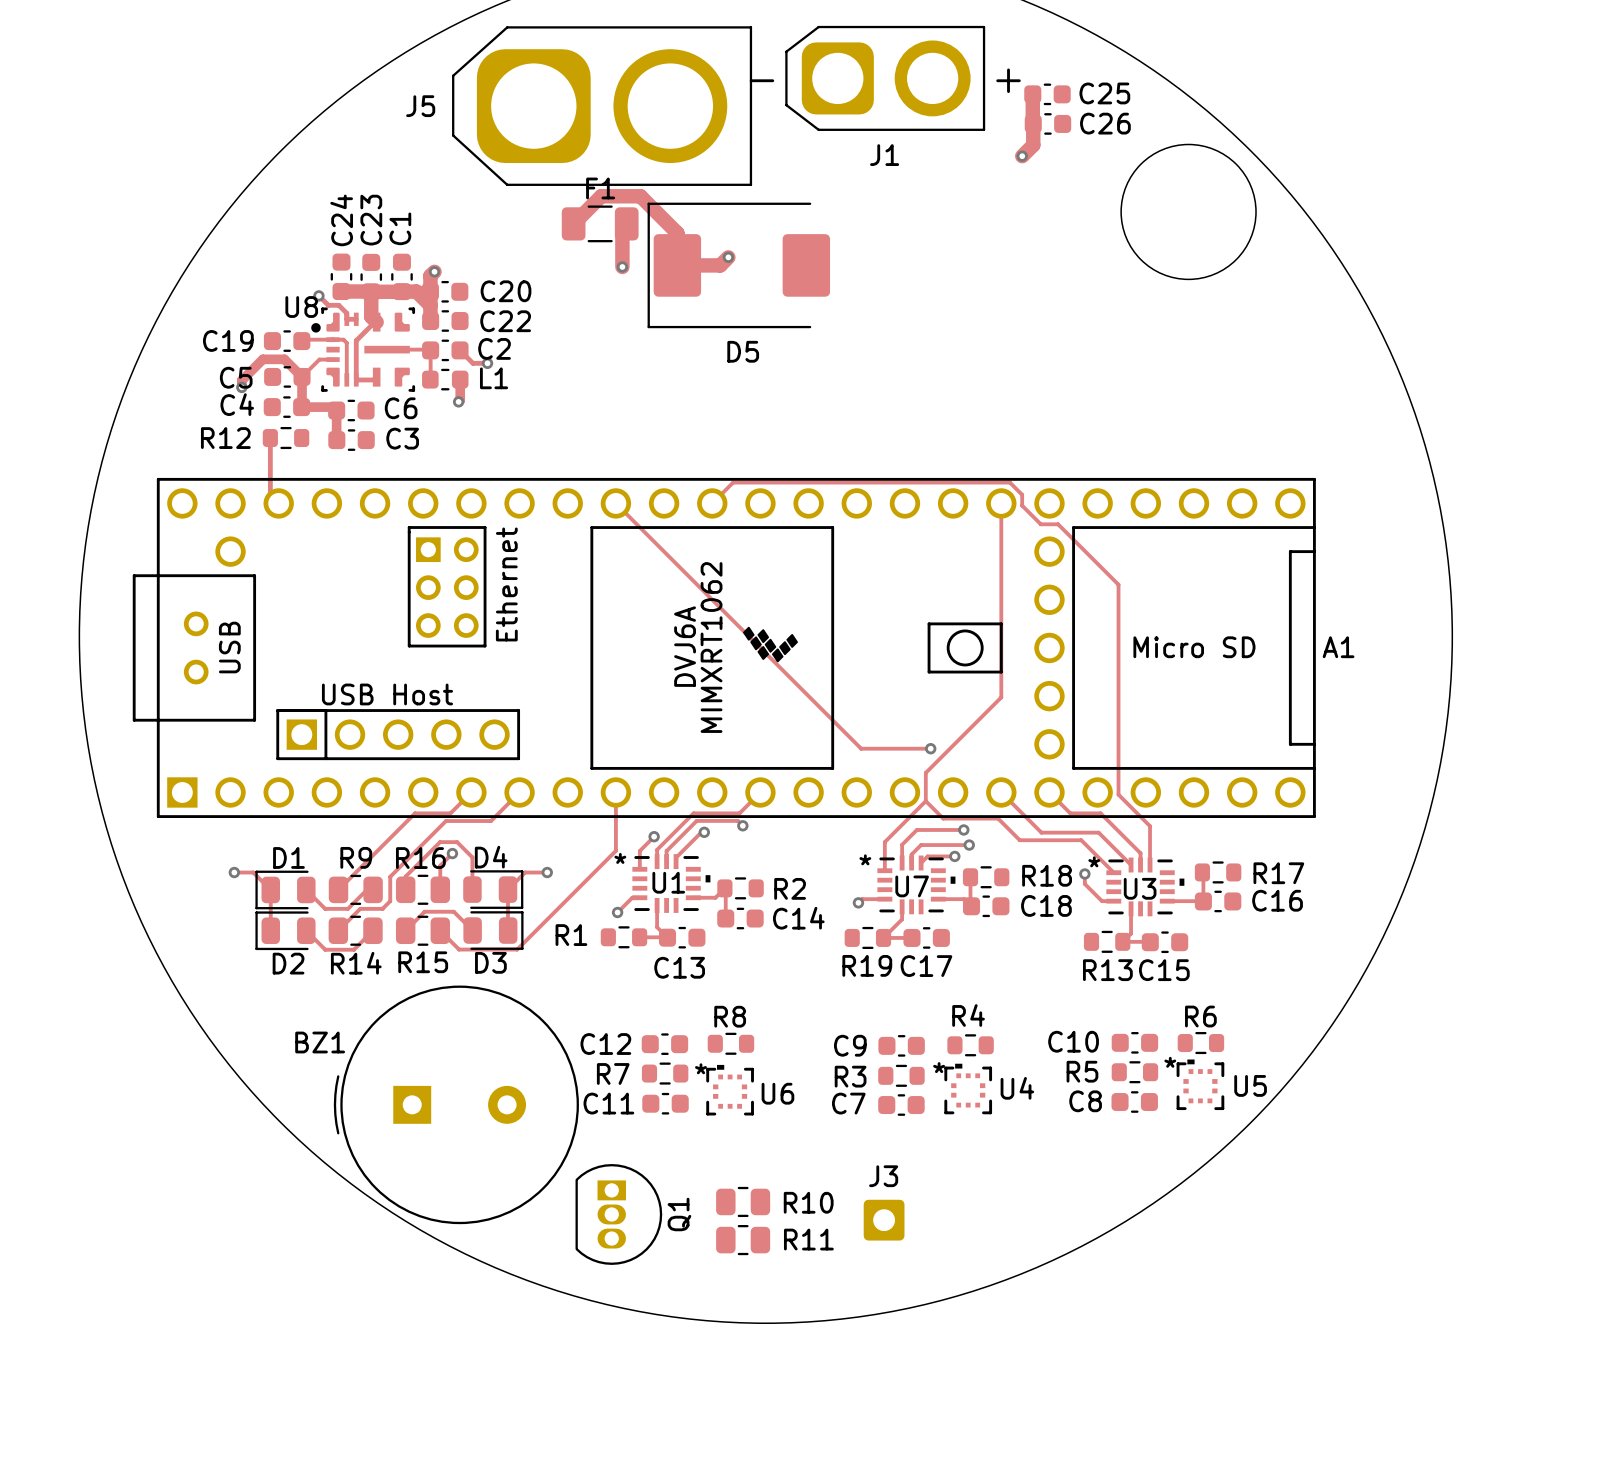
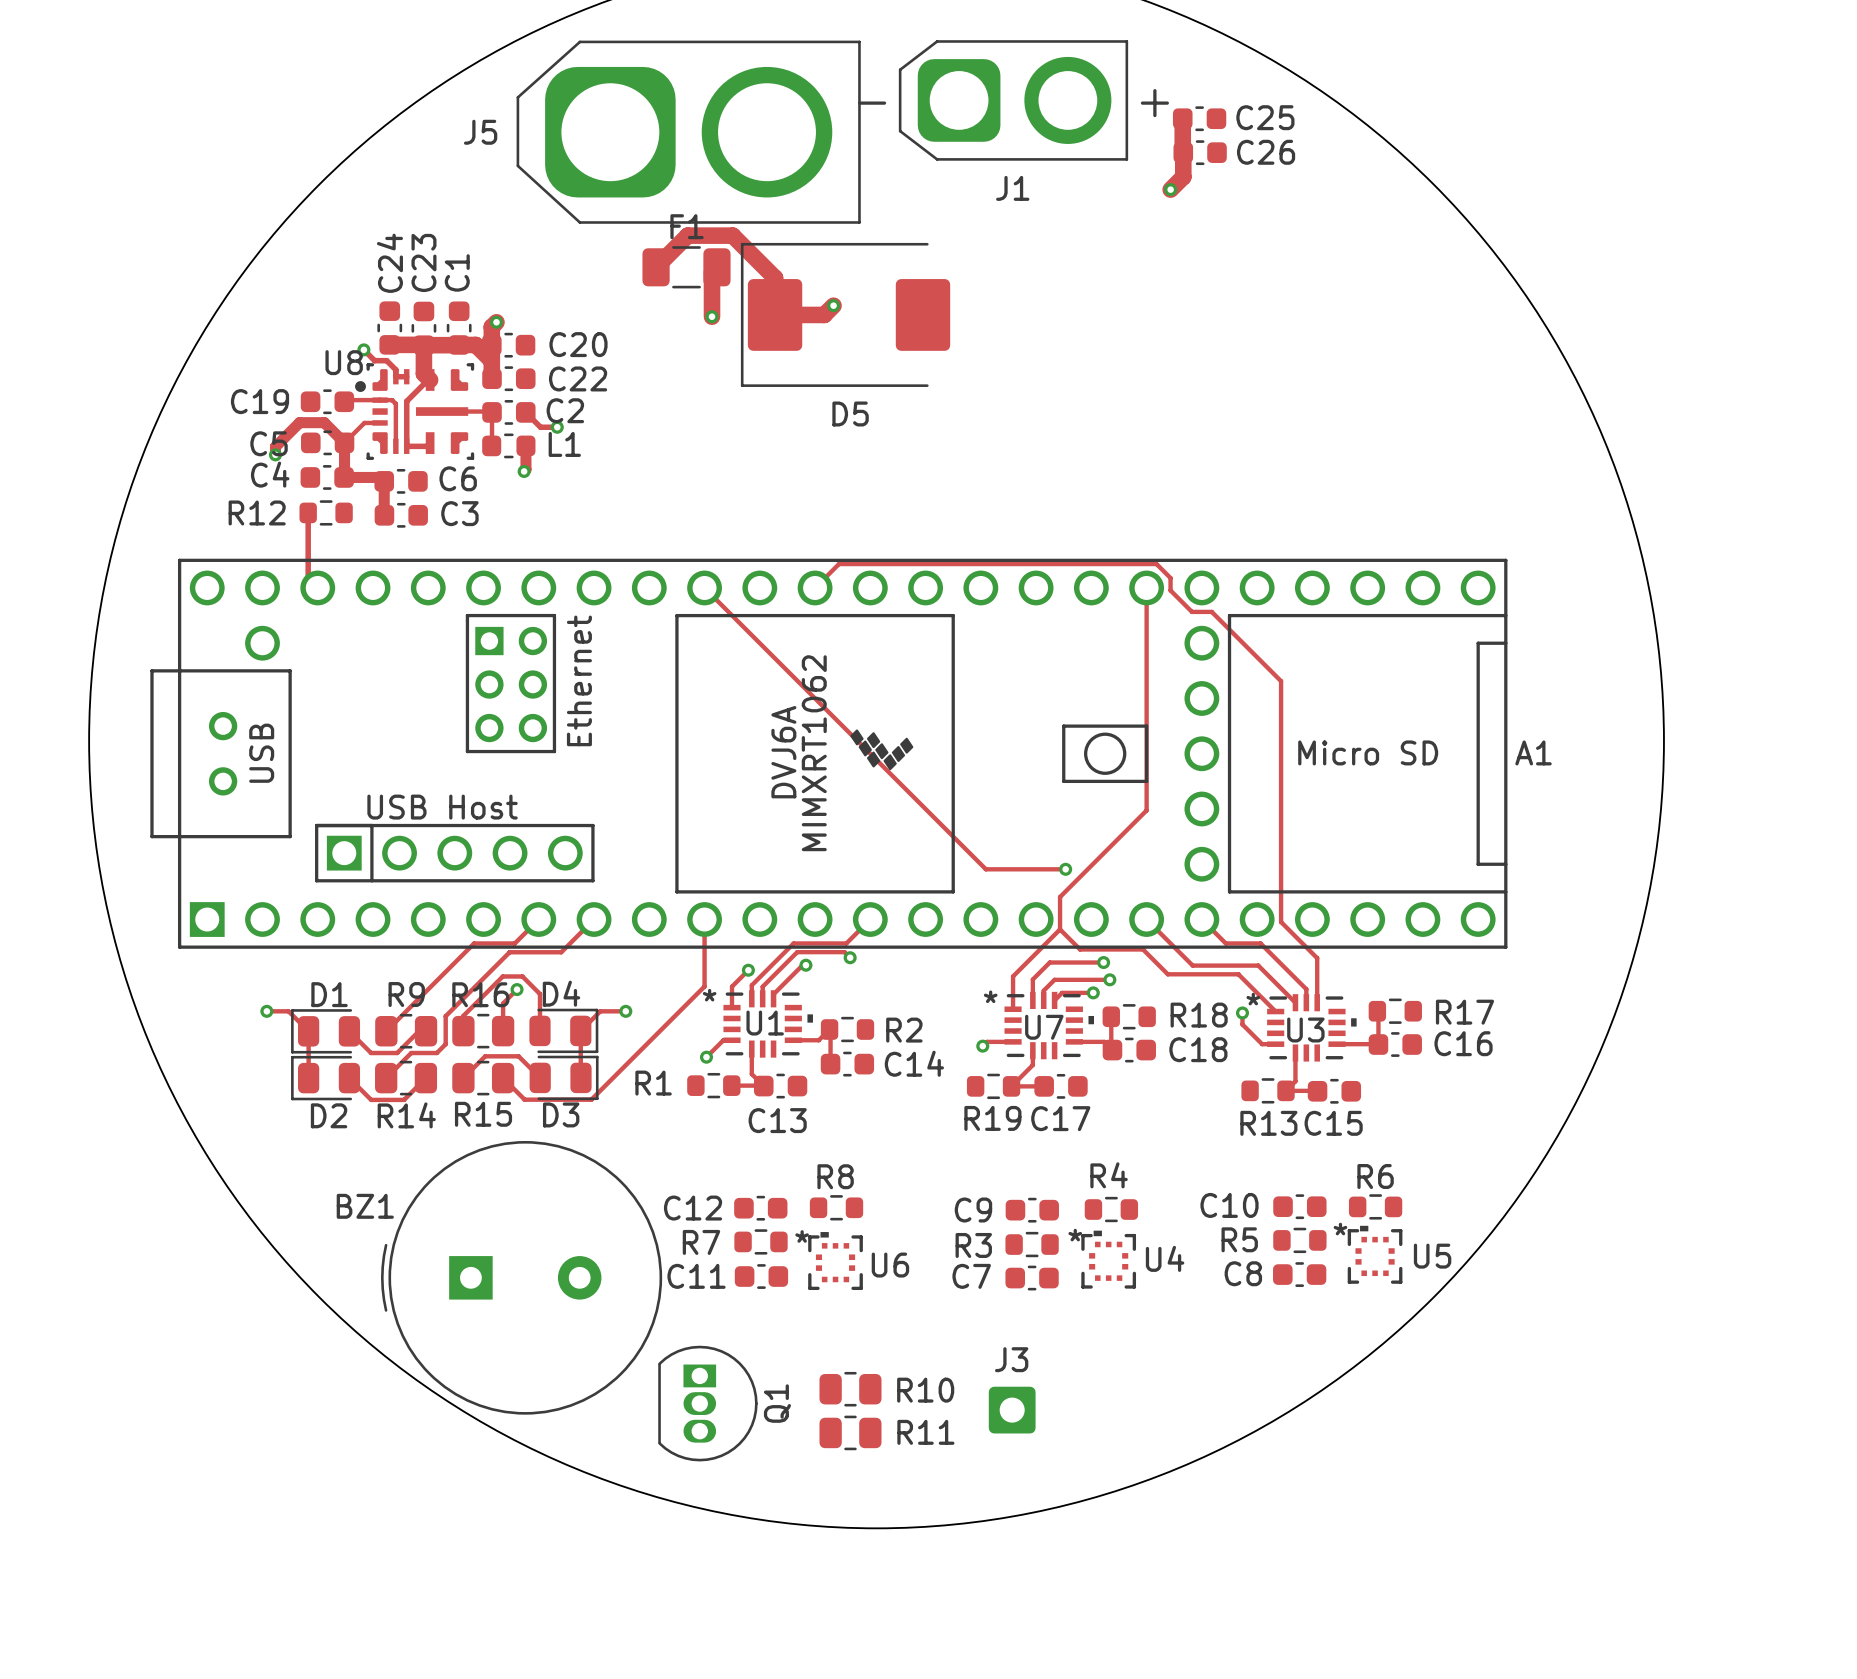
round board edge: [1120, 144, 1257, 280] -> none

